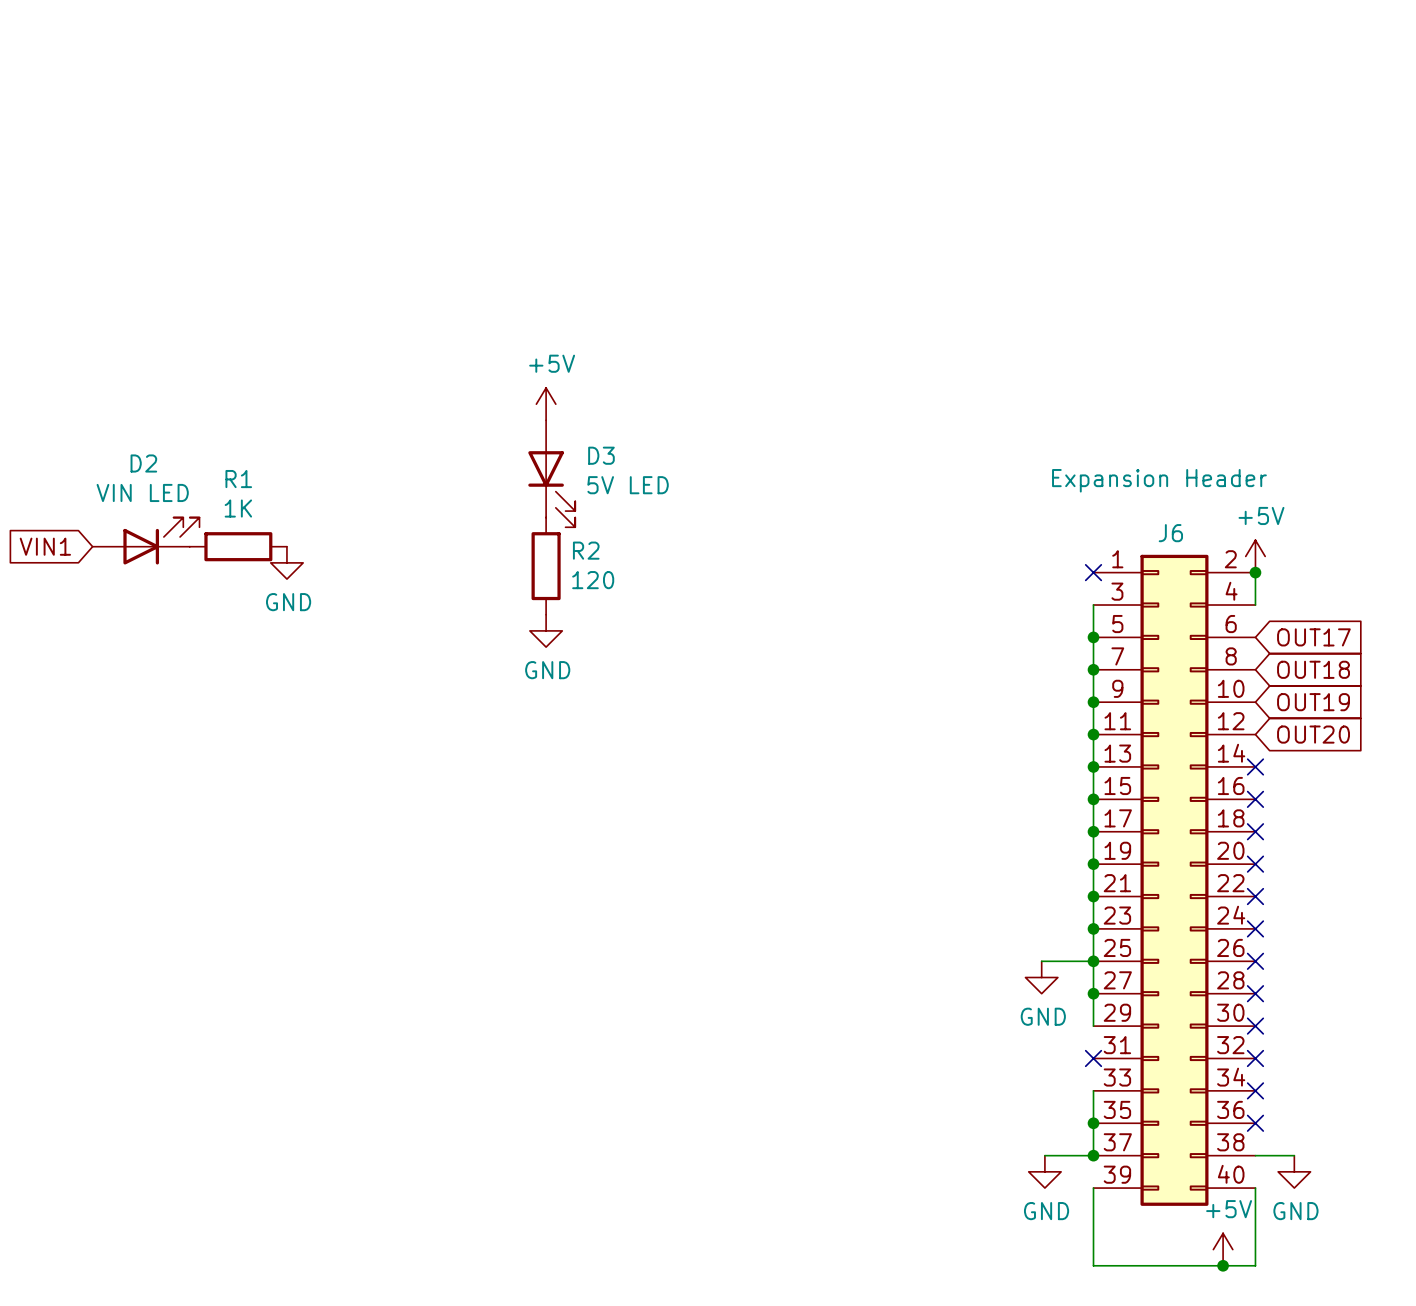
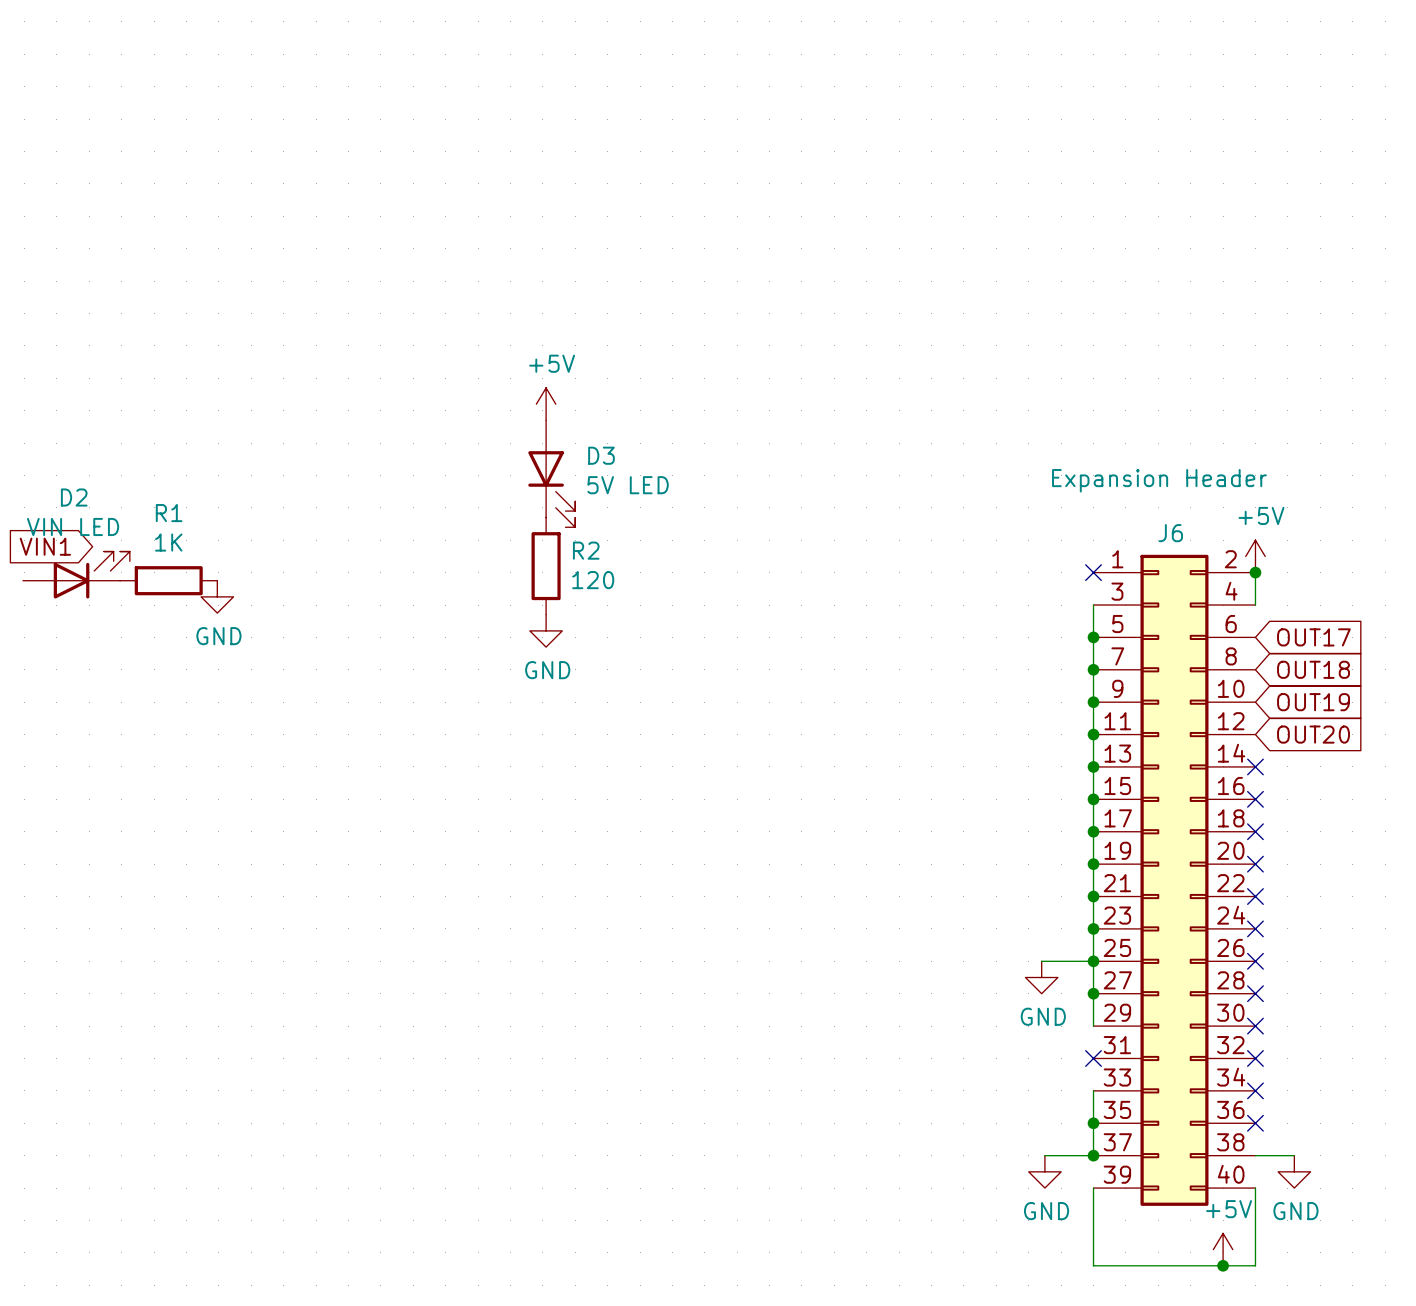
D2 position: (146, 541) -> (76, 575)
R1 position: (238, 546) -> (168, 580)
power symbol position: GND (286, 562) -> GND (217, 596)

